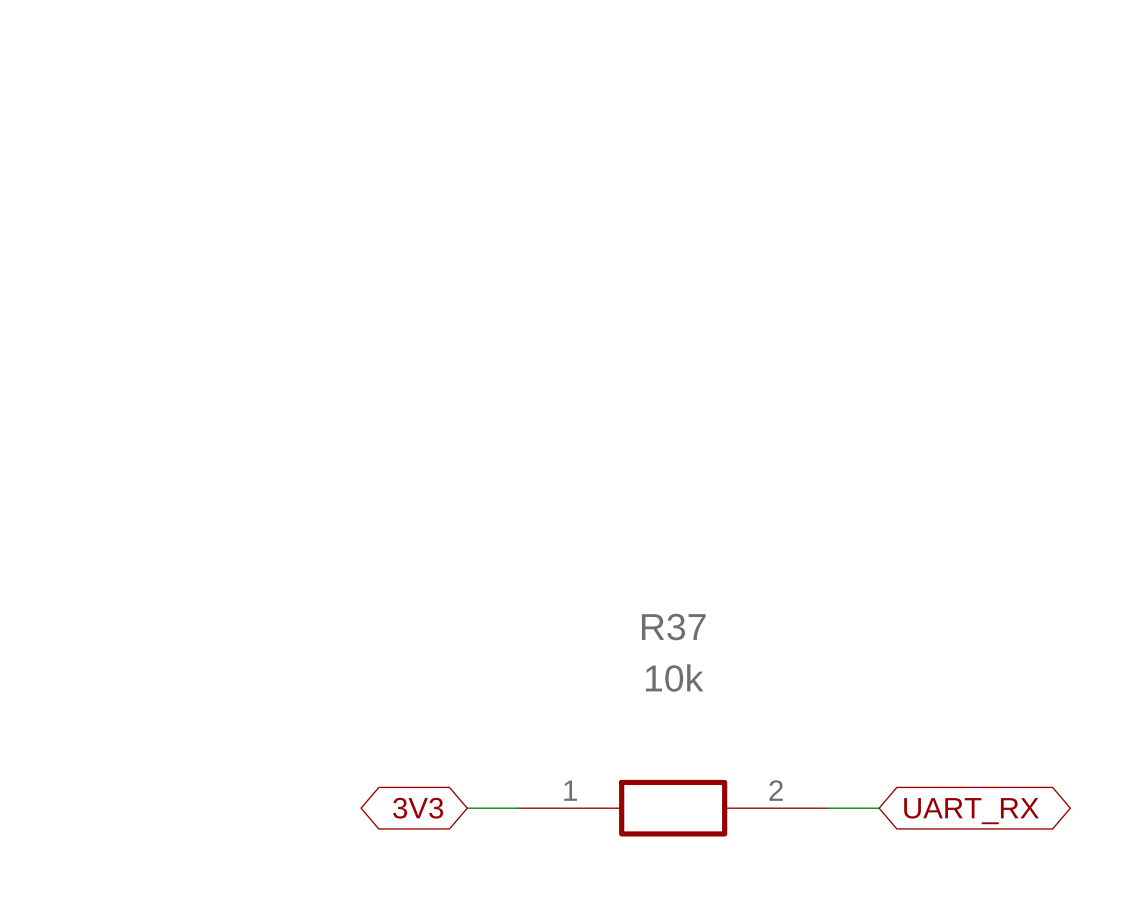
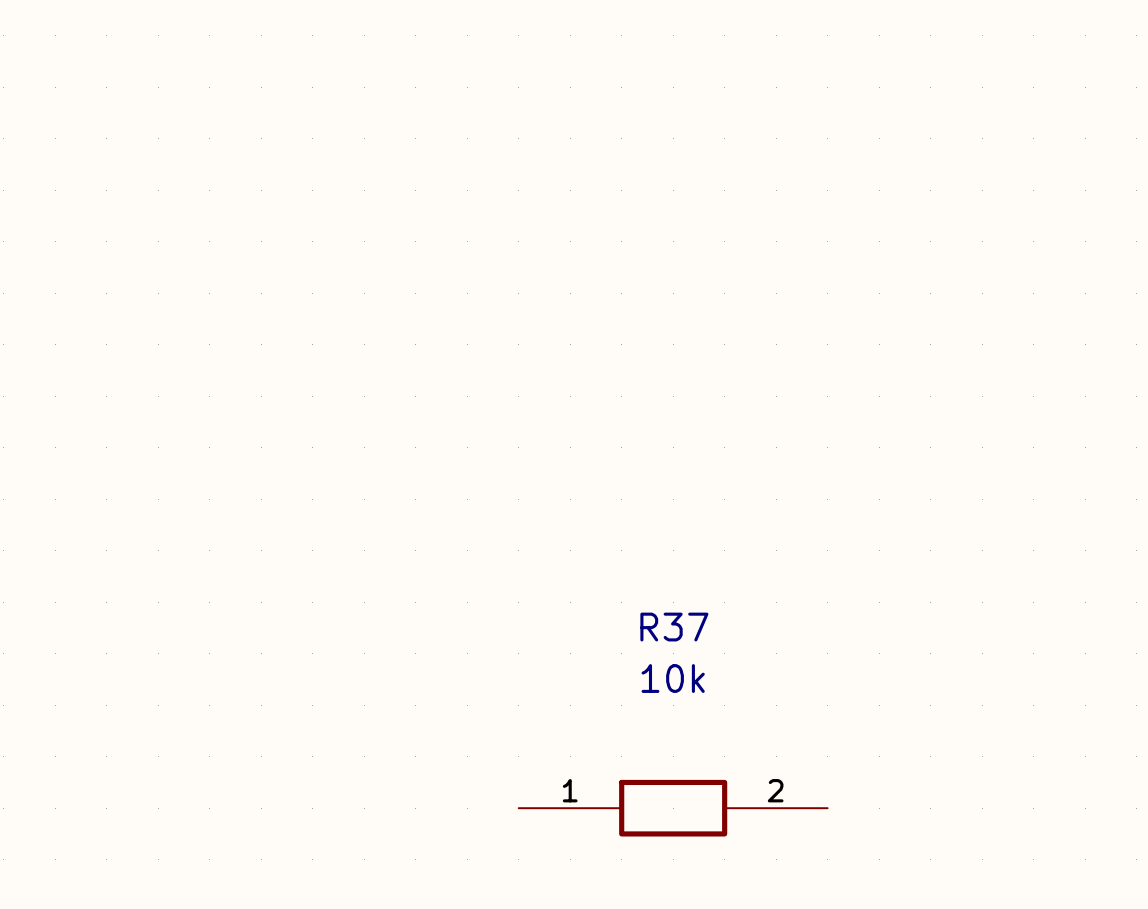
global label: 3V3 (418, 808) -> none
wire: (467, 808) (518, 808) -> none
wire: (827, 808) (879, 808) -> none
global label: UART_RX (971, 811) -> none

